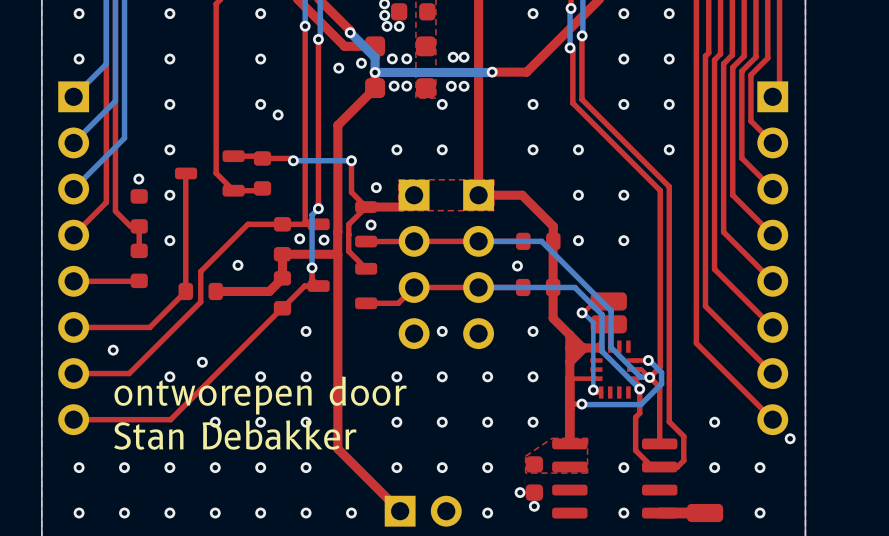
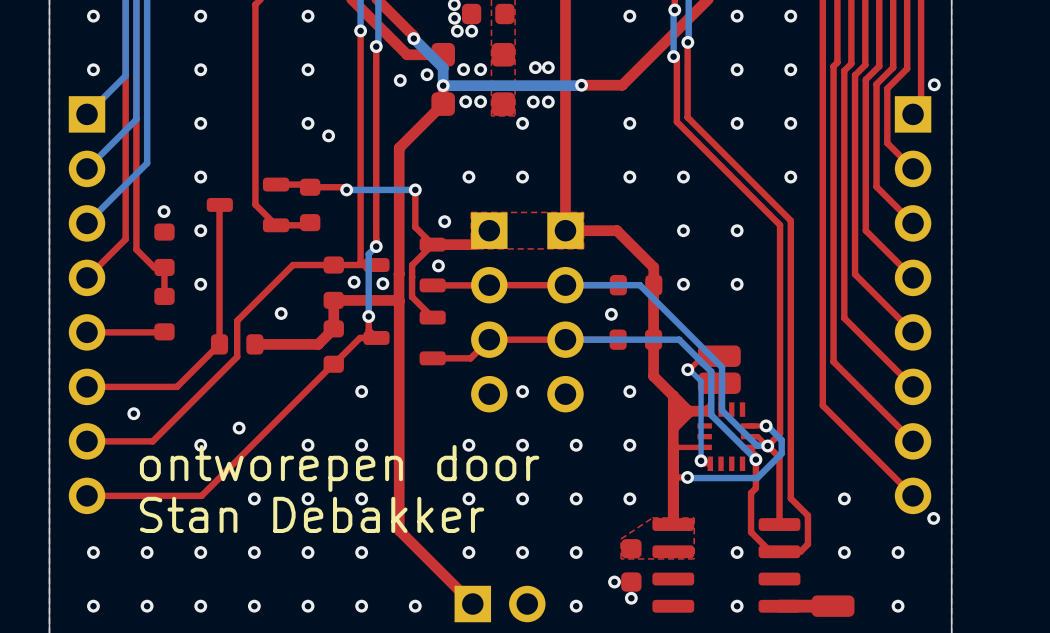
via: none -> (934, 84)

